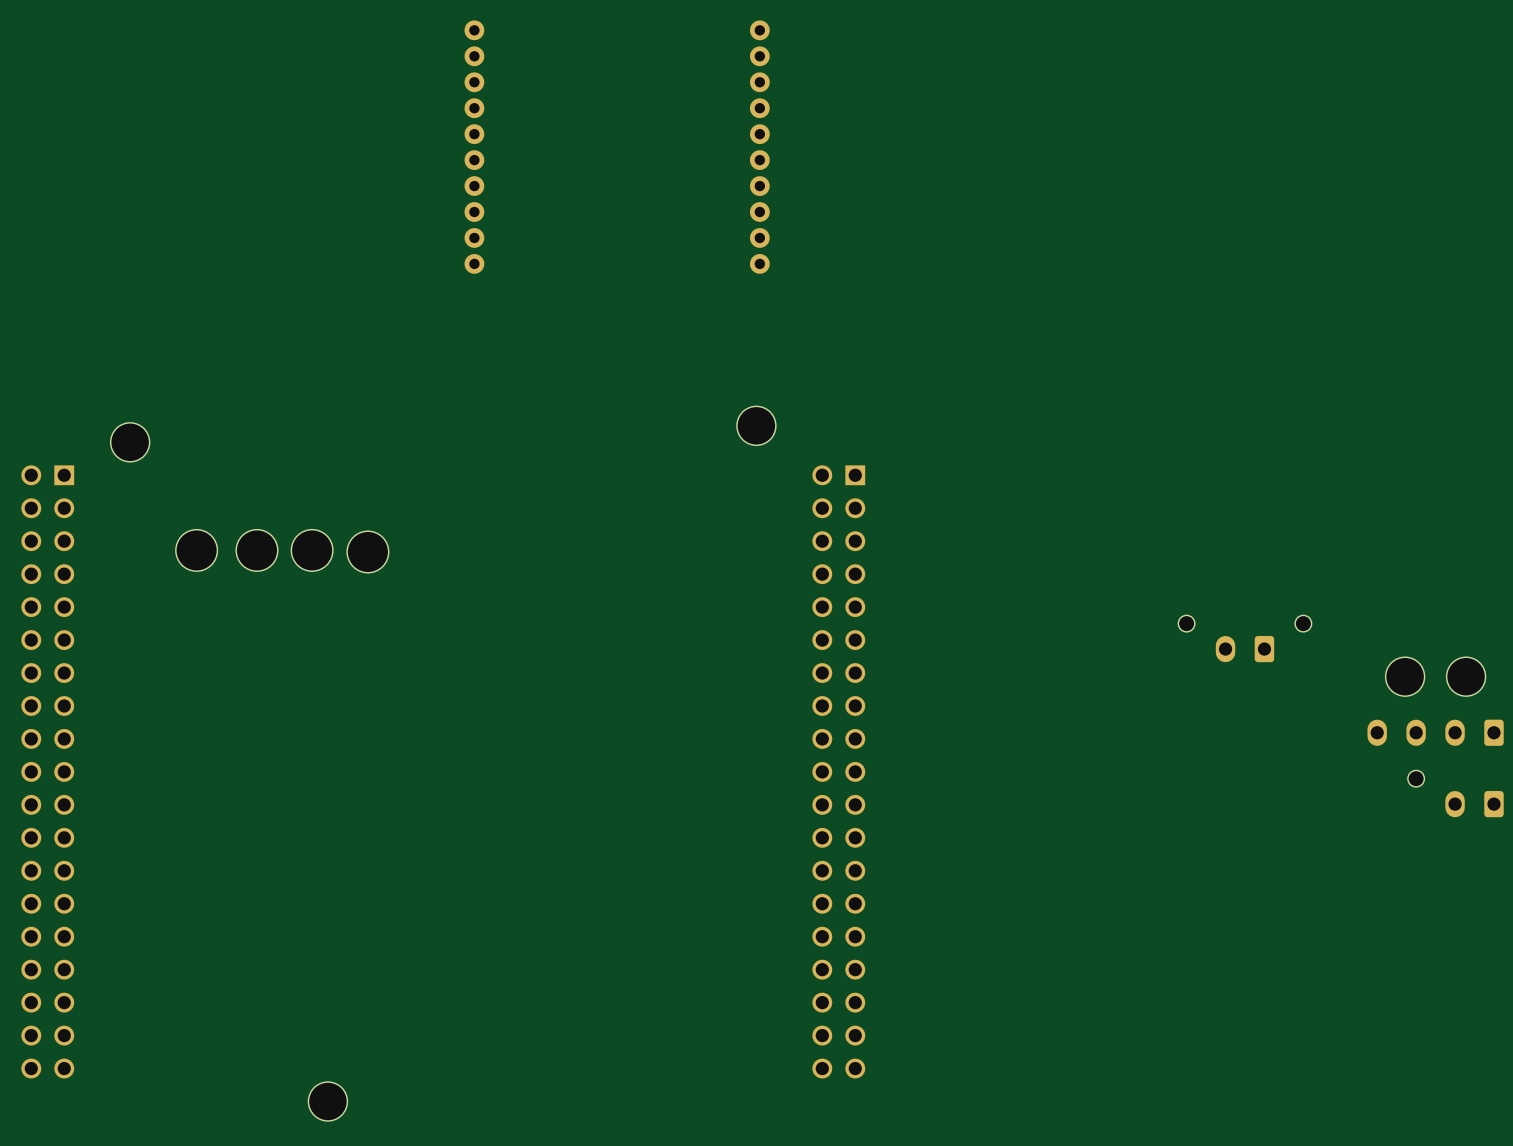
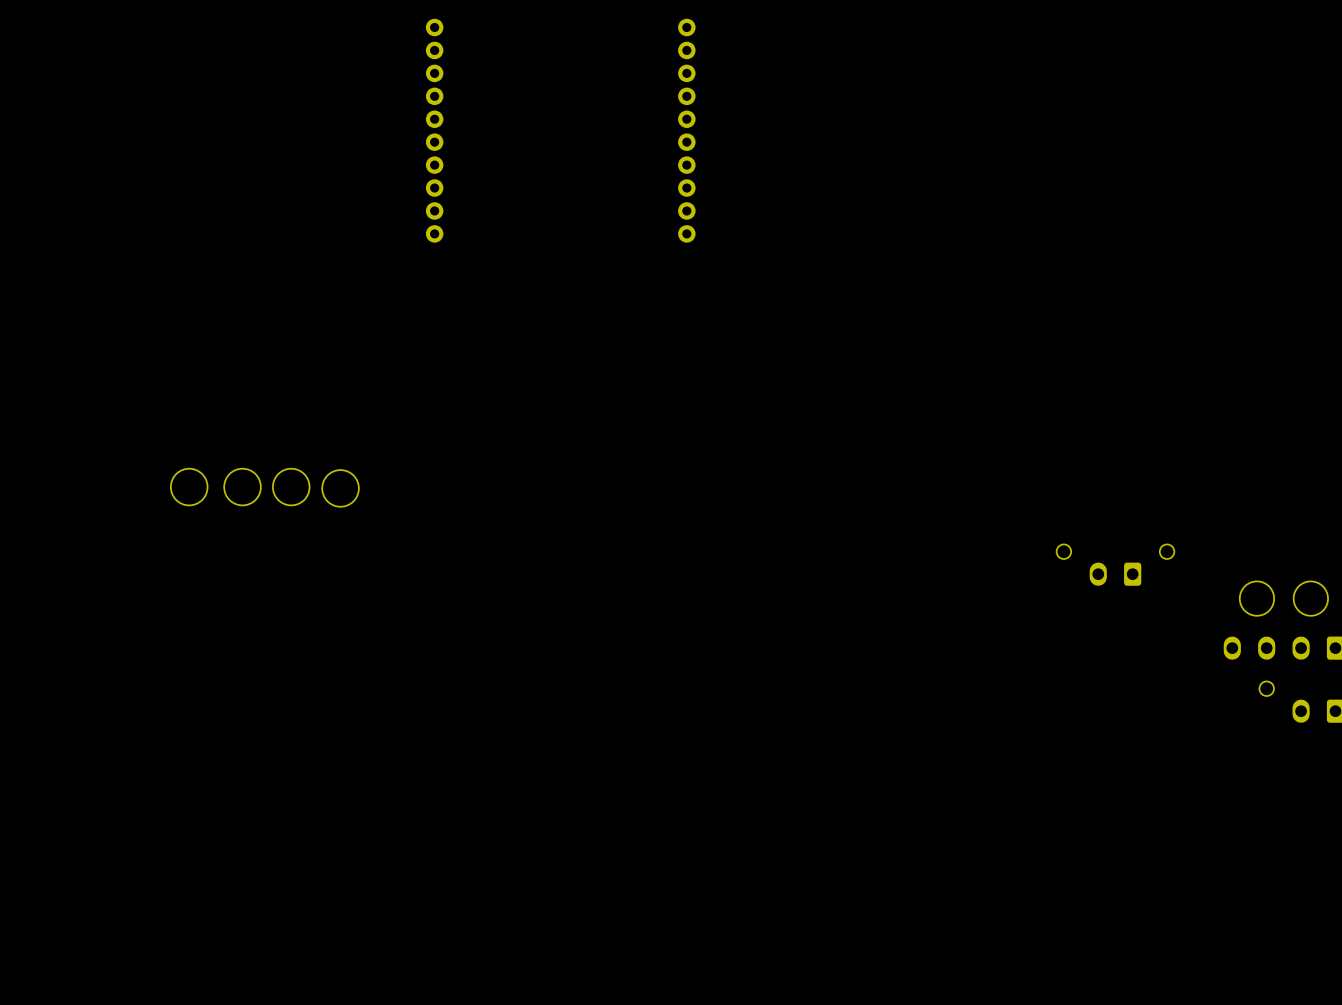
part: (756, 425) -> none
part: (130, 442) -> none
part: (47, 771) -> none
part: (838, 771) -> none
part: (327, 1101) -> none

